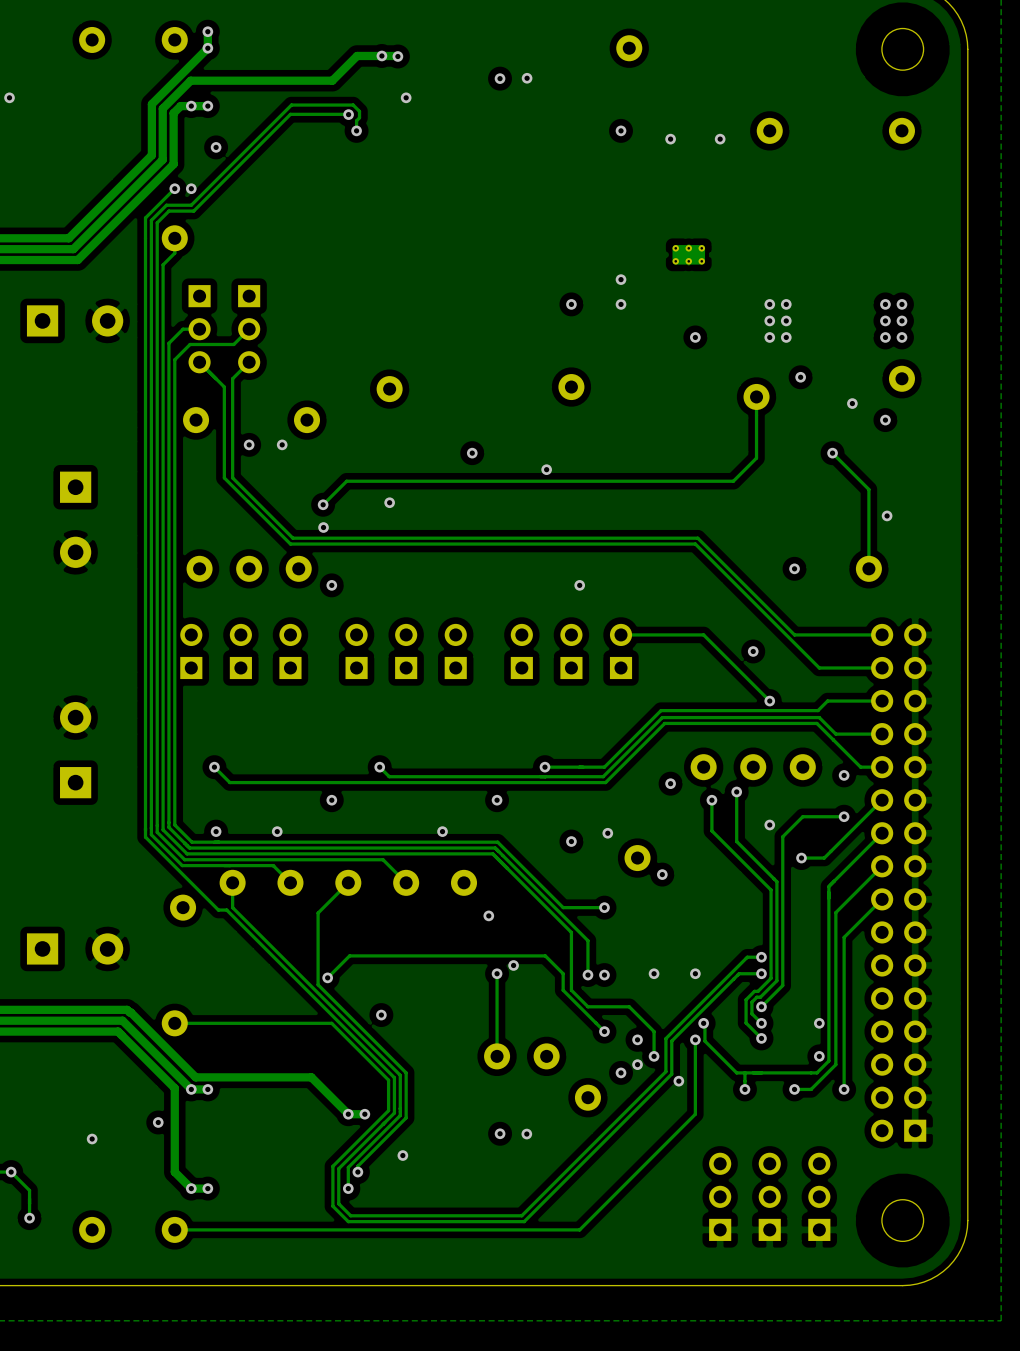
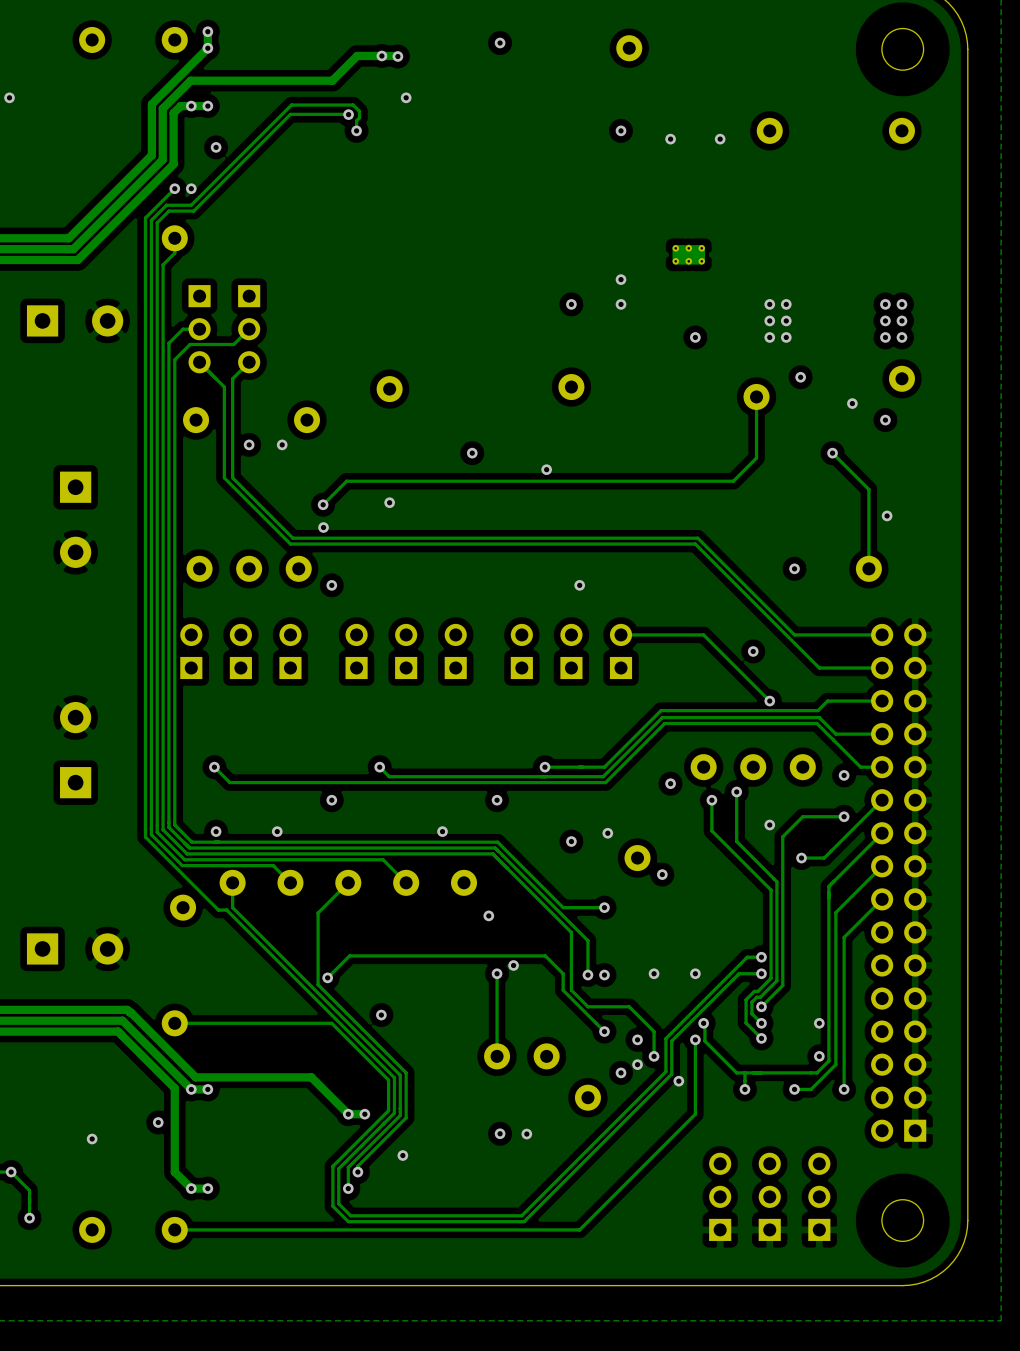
via: none -> (500, 43)
via: (500, 78) -> none
via: (527, 78) -> none

